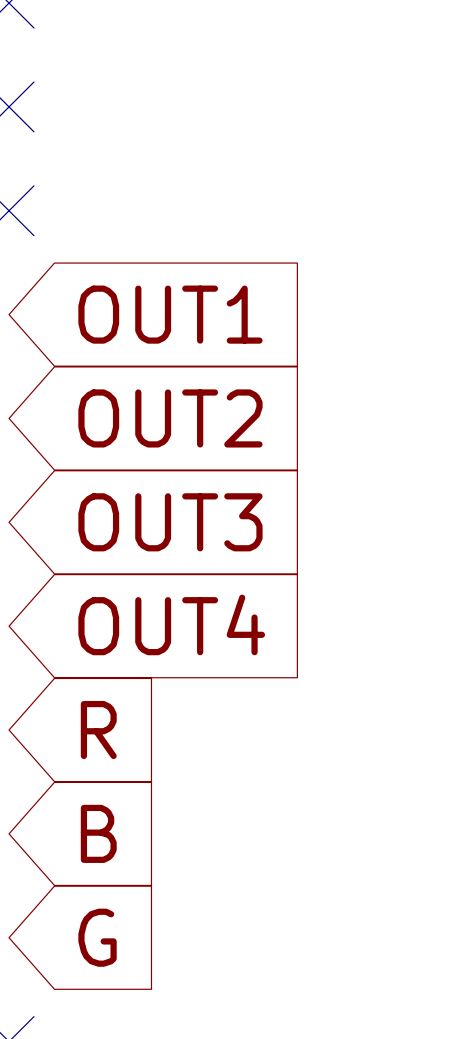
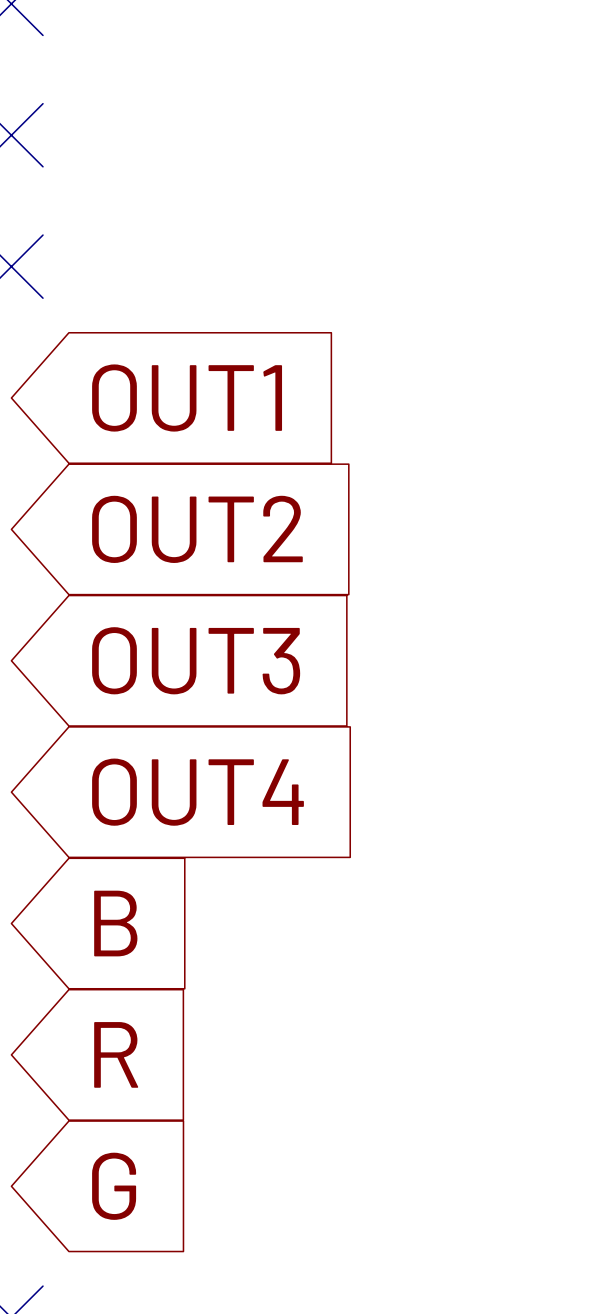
global label: R (98, 730) -> B (115, 923)
global label: B (98, 833) -> R (116, 1054)

